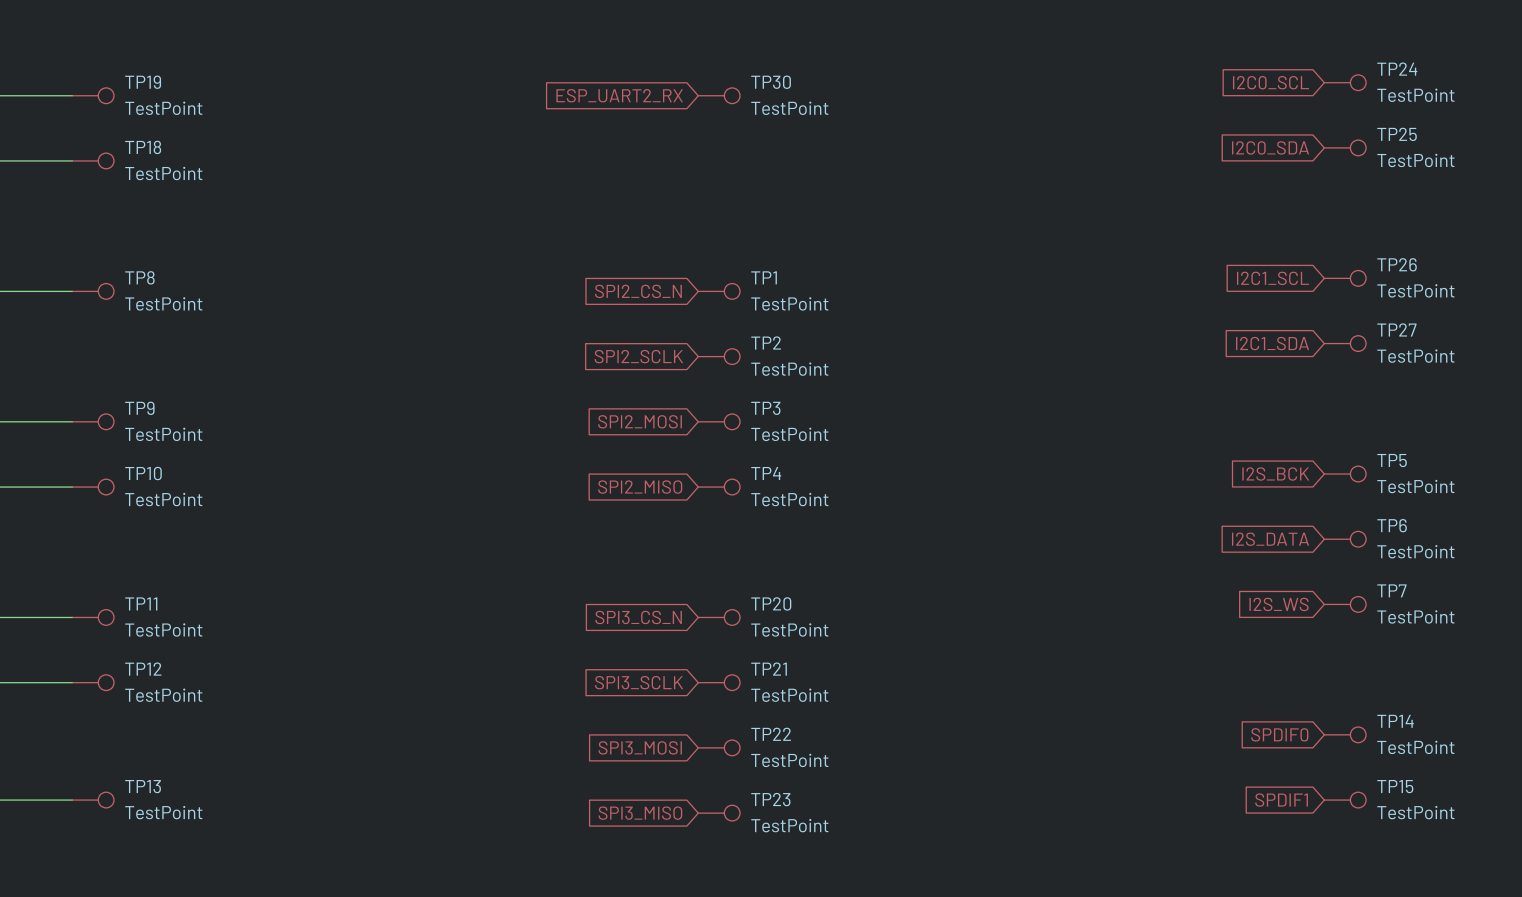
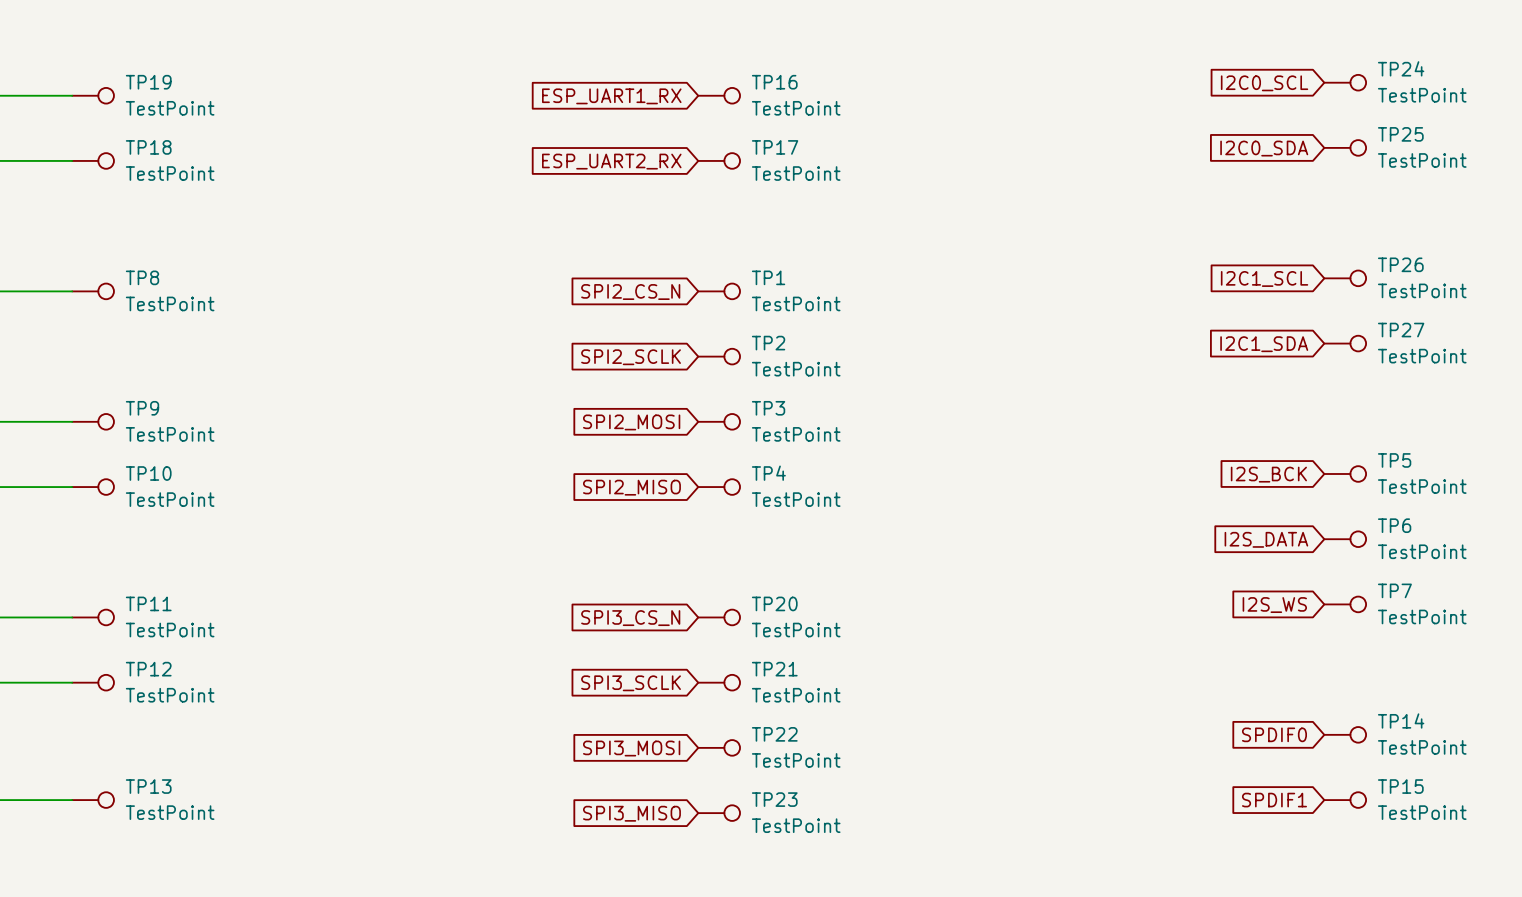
TP30 name: TP30 (771, 82) -> TP16 (774, 82)
global label: ESP_UART2_RX (619, 95) -> ESP_UART1_RX (611, 96)
global label: none -> ESP_UART2_RX (611, 161)
TP17: none -> TestPoint (719, 160)

